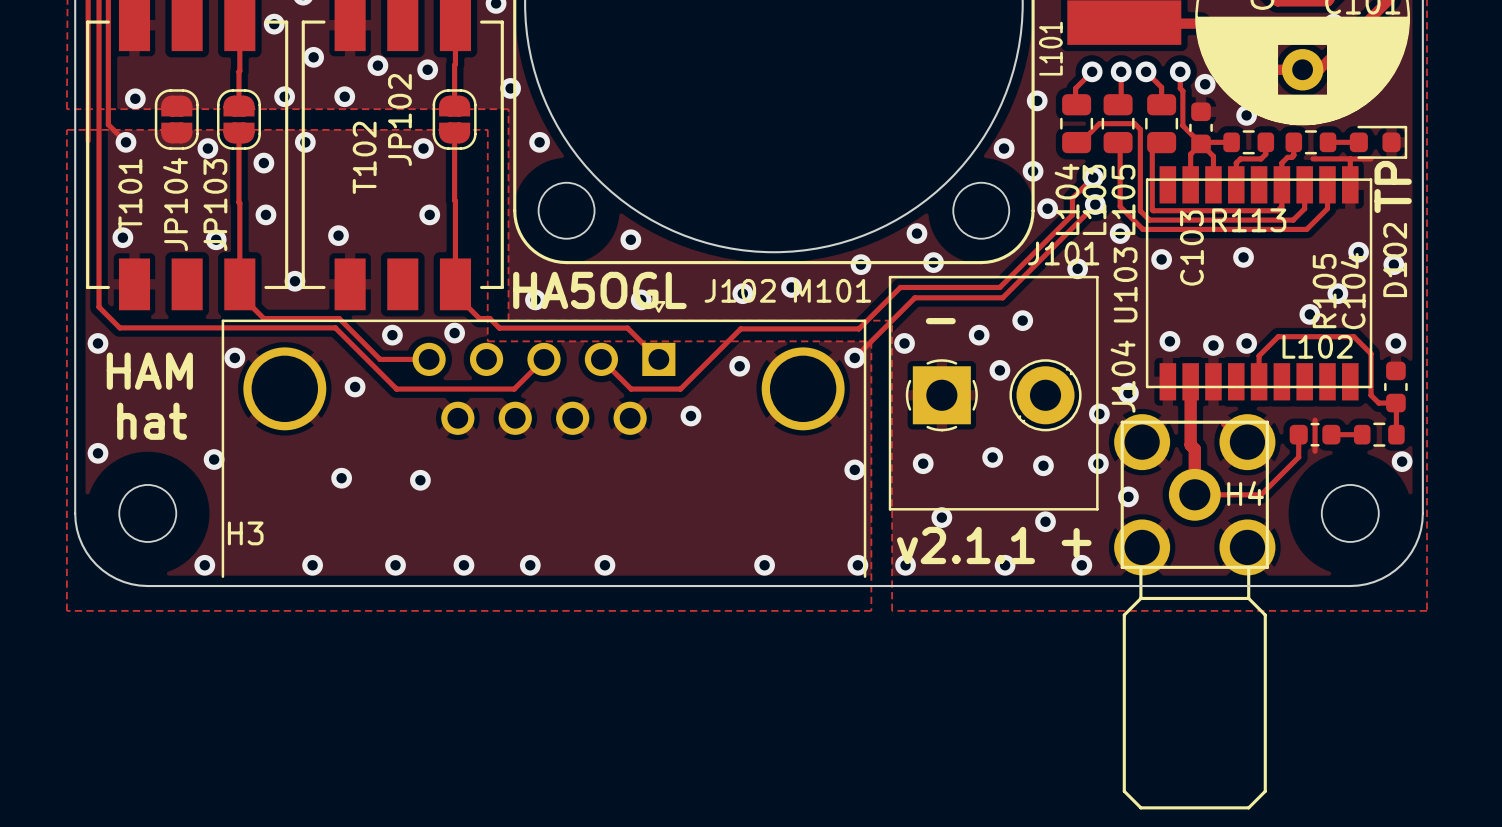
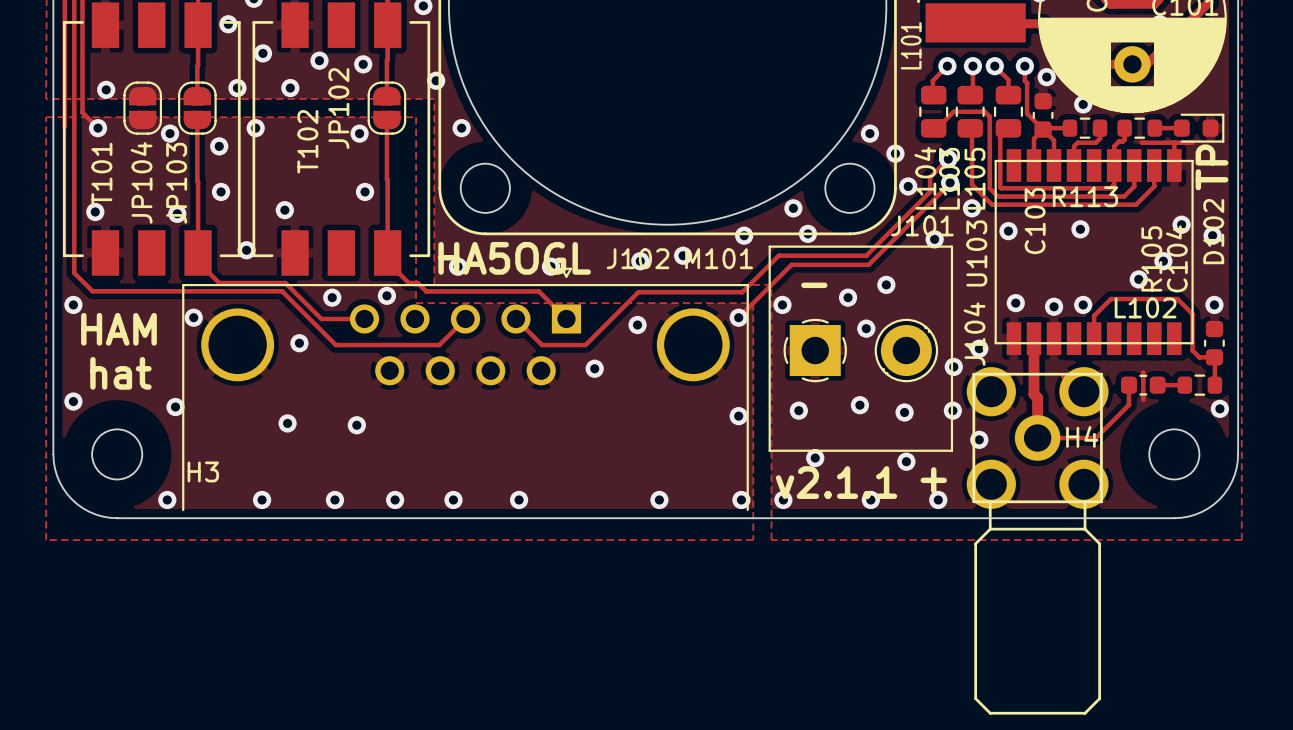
via: (1037, 100) -> none
via: (630, 239) -> none

